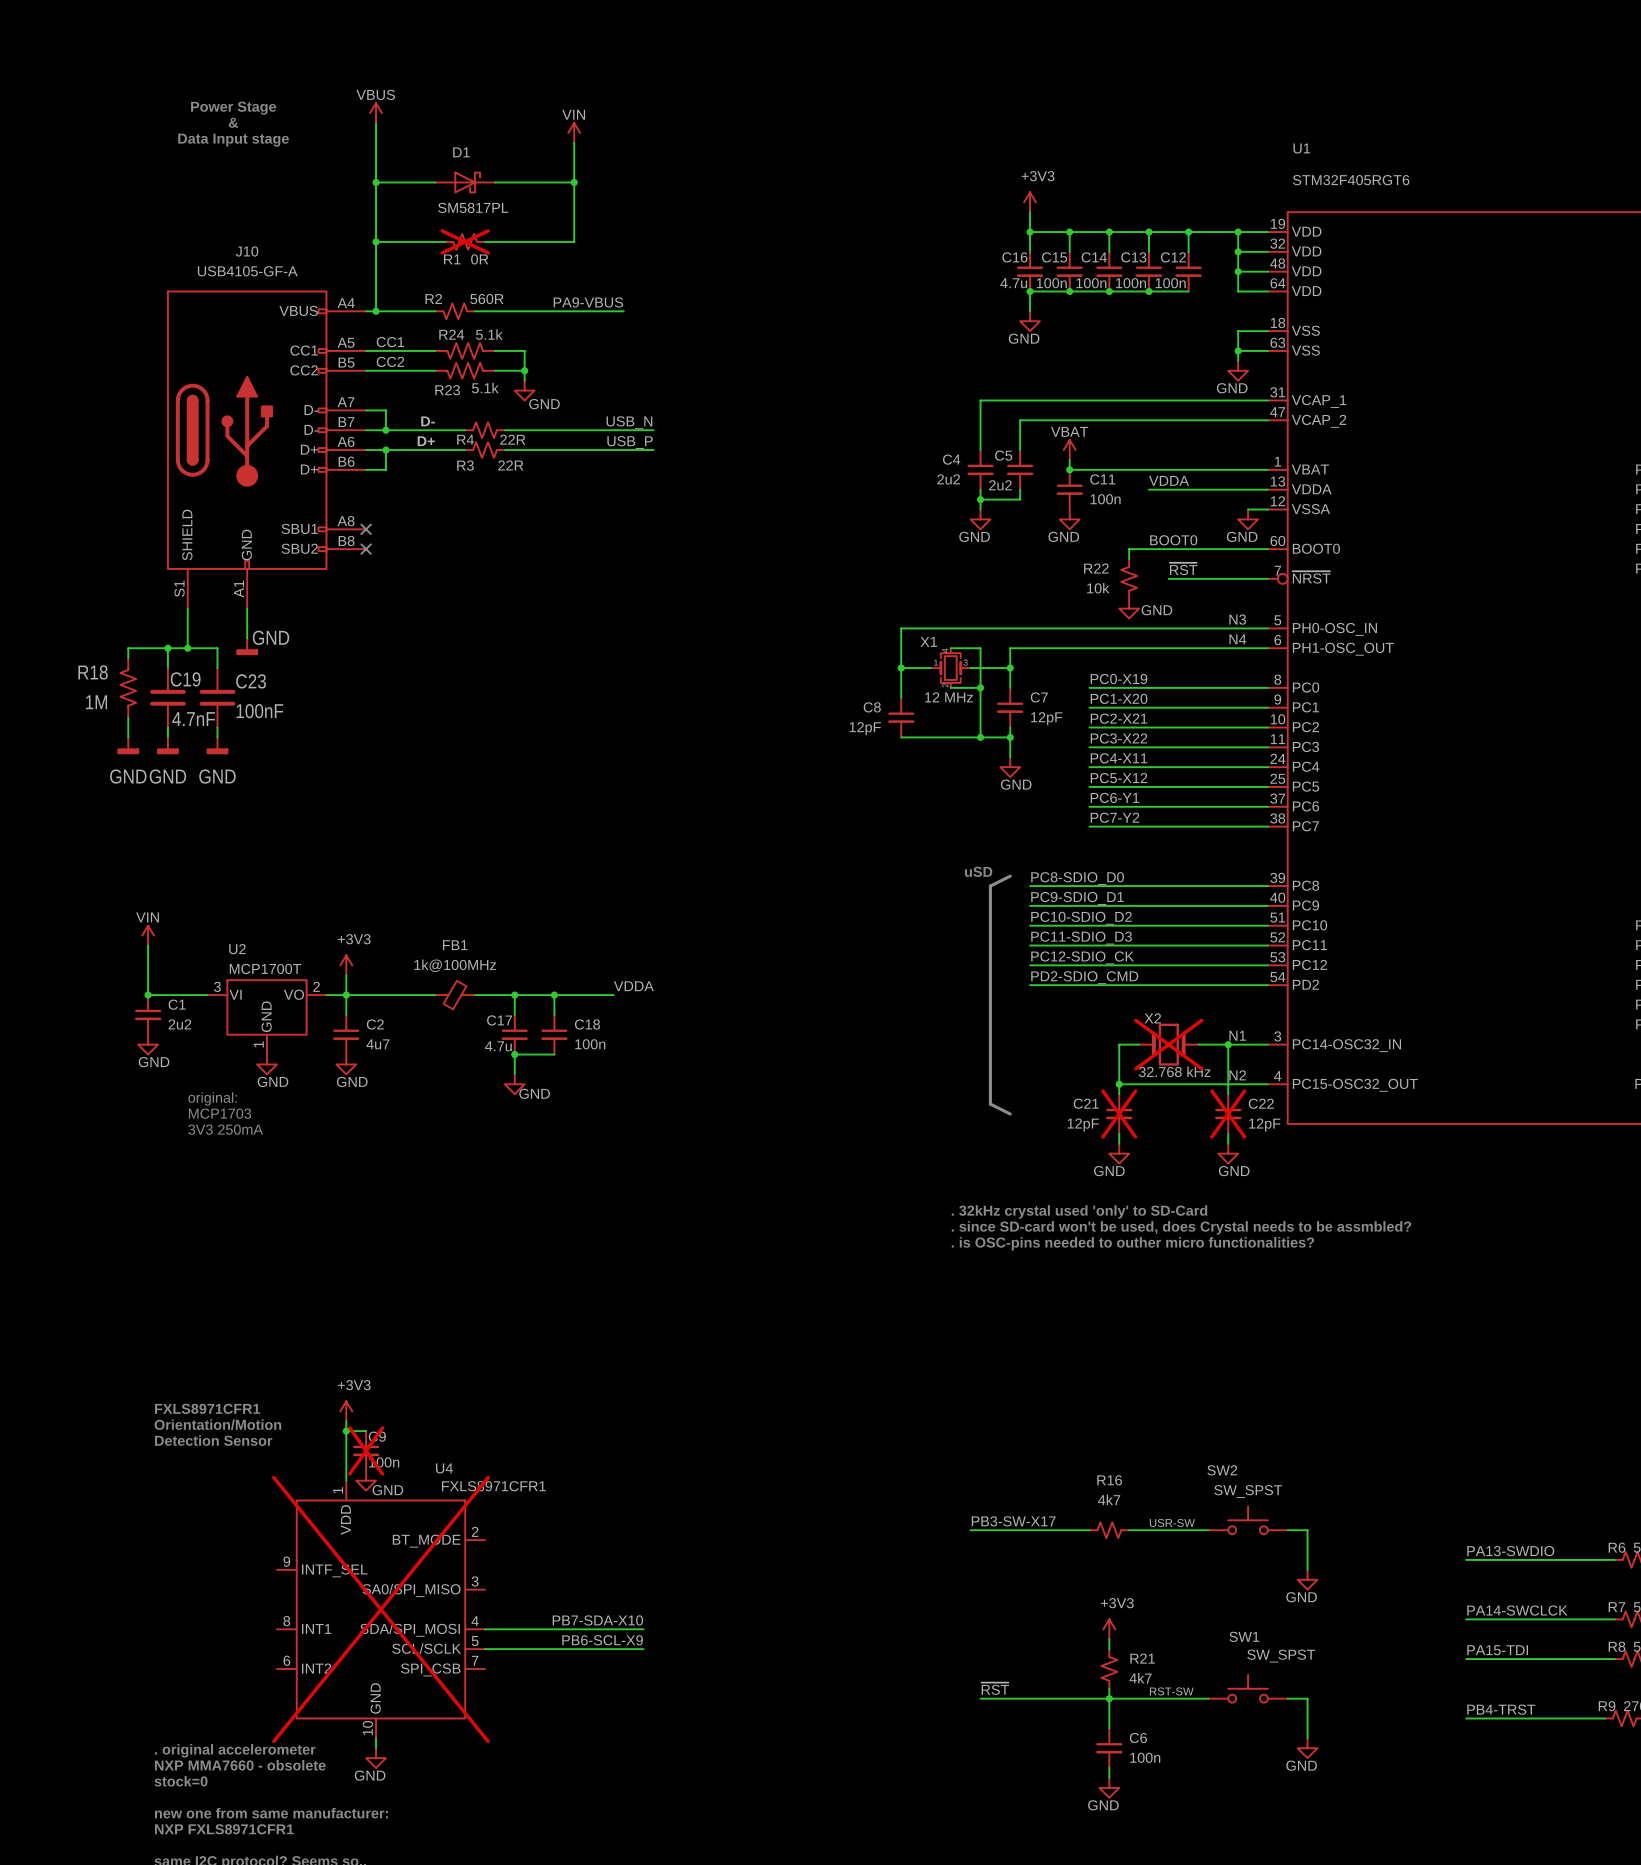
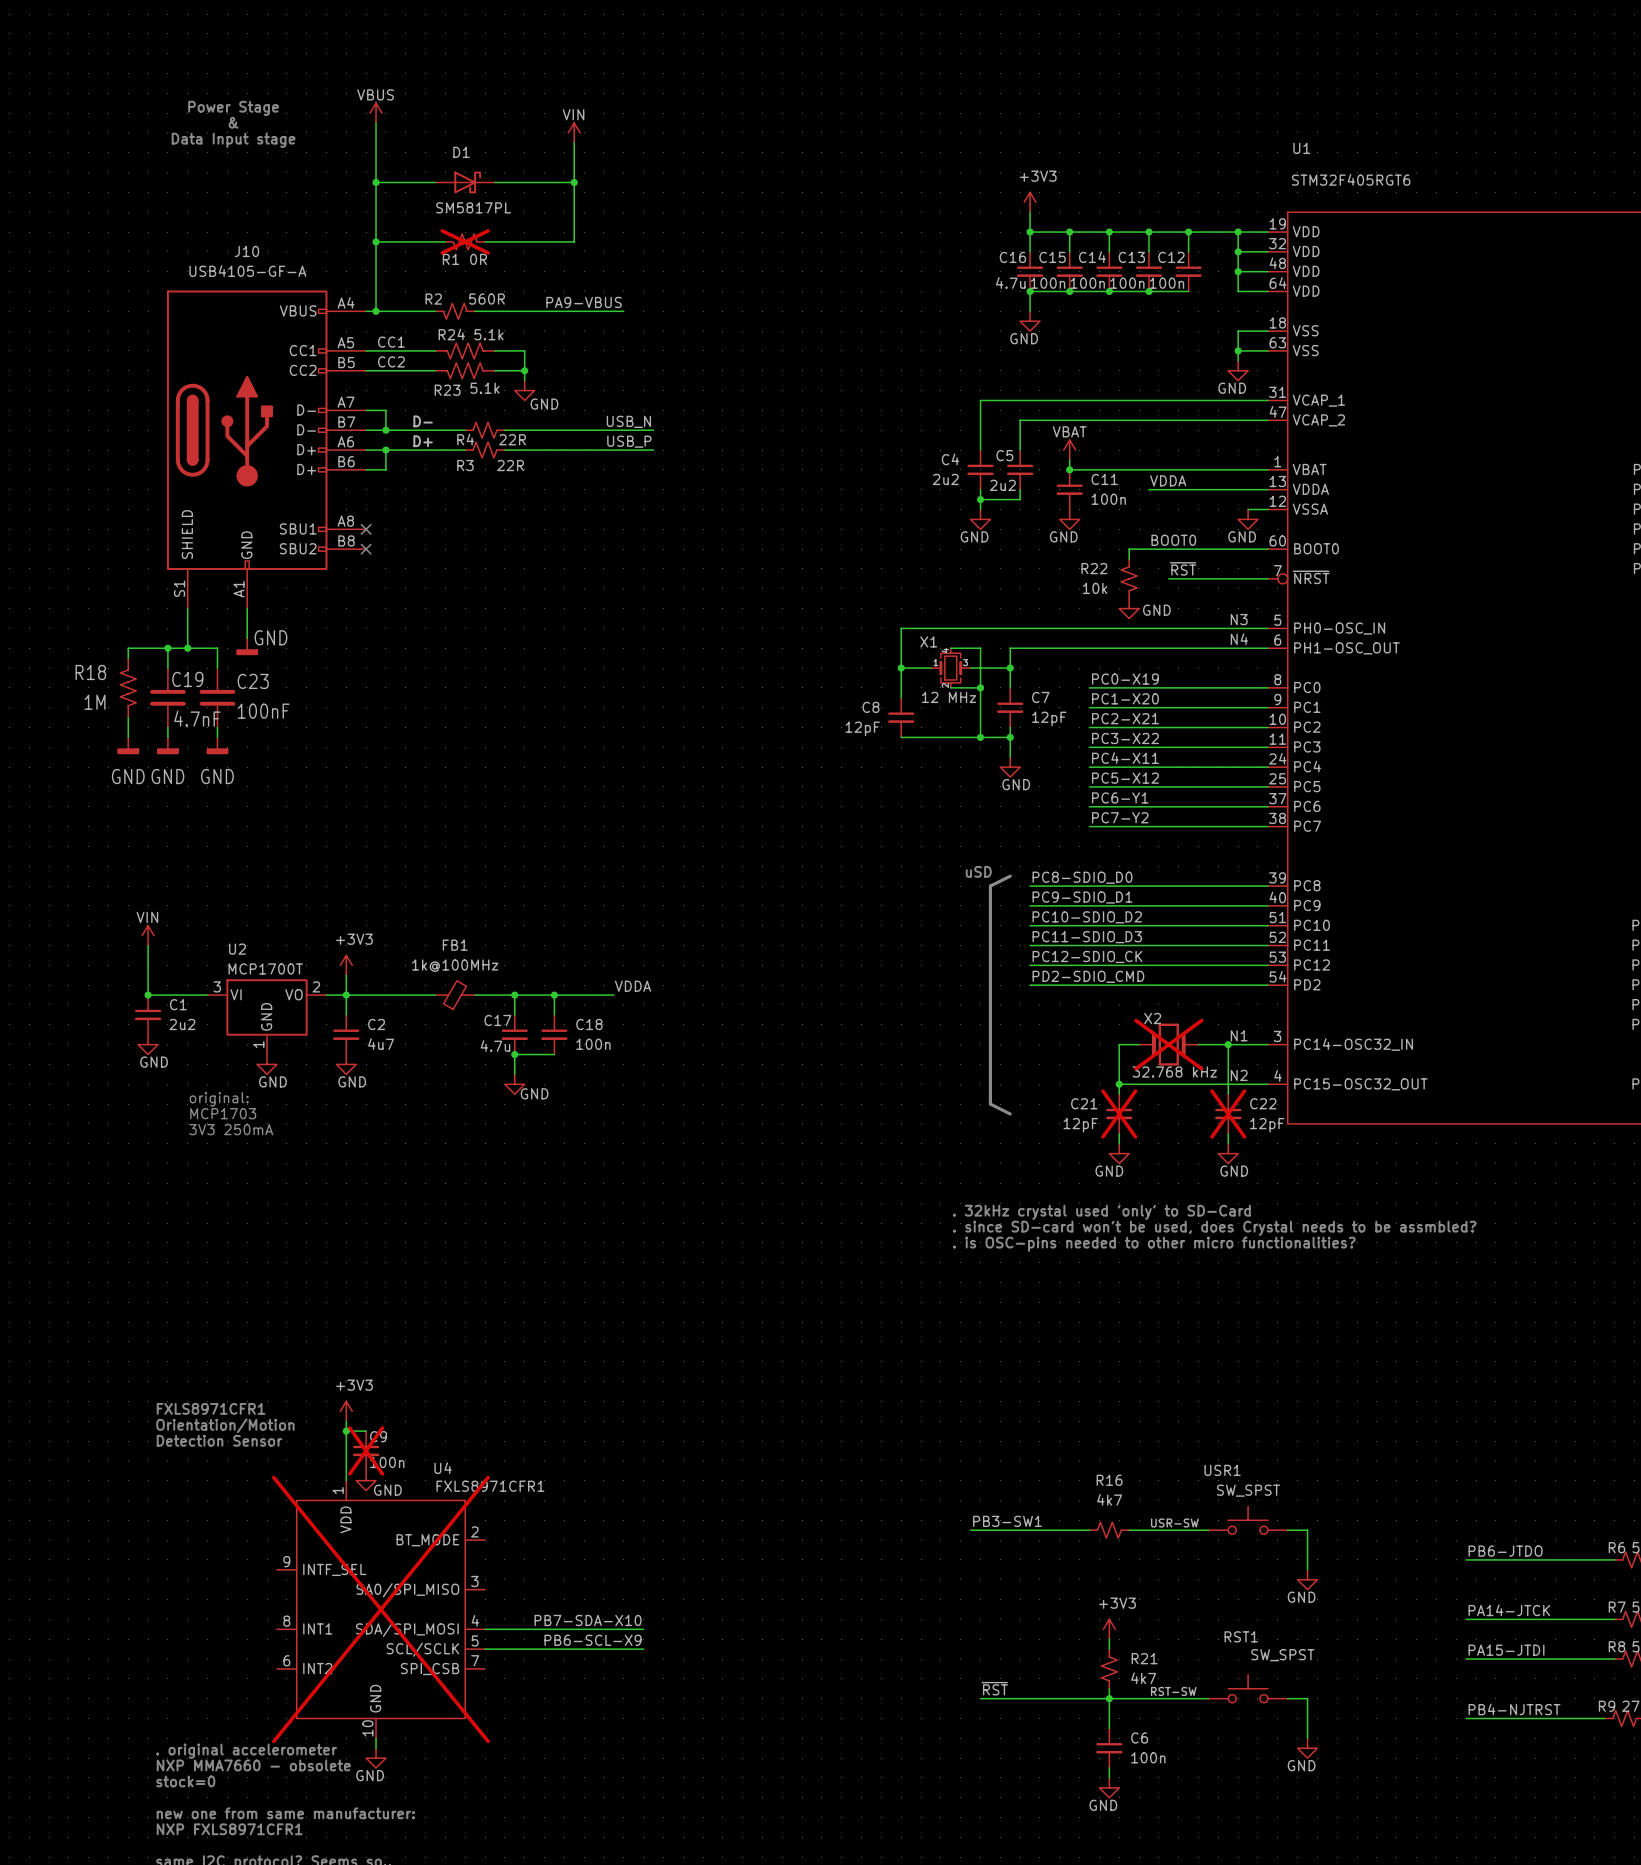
text: . is OSC-pins needed to outher micro functionalities? (1132, 1243) -> . is OSC-pins needed to other micro functionalities? (1154, 1244)
SW2 name: SW2 (1222, 1470) -> USR1 (1222, 1470)
label: PB3-SW-X17 (1013, 1521) -> PB3-SW1 (1007, 1521)
label: PA13-SWDIO (1510, 1551) -> PB6-JTDO (1505, 1551)
label: PA14-SWCLCK (1517, 1610) -> PA14-JTCK (1509, 1610)
SW1 name: SW1 (1244, 1636) -> RST1 (1241, 1636)
label: PA15-TDI (1497, 1650) -> PA15-JTDI (1506, 1650)
label: PB4-TRST (1501, 1709) -> PB4-NJTRST (1514, 1709)

